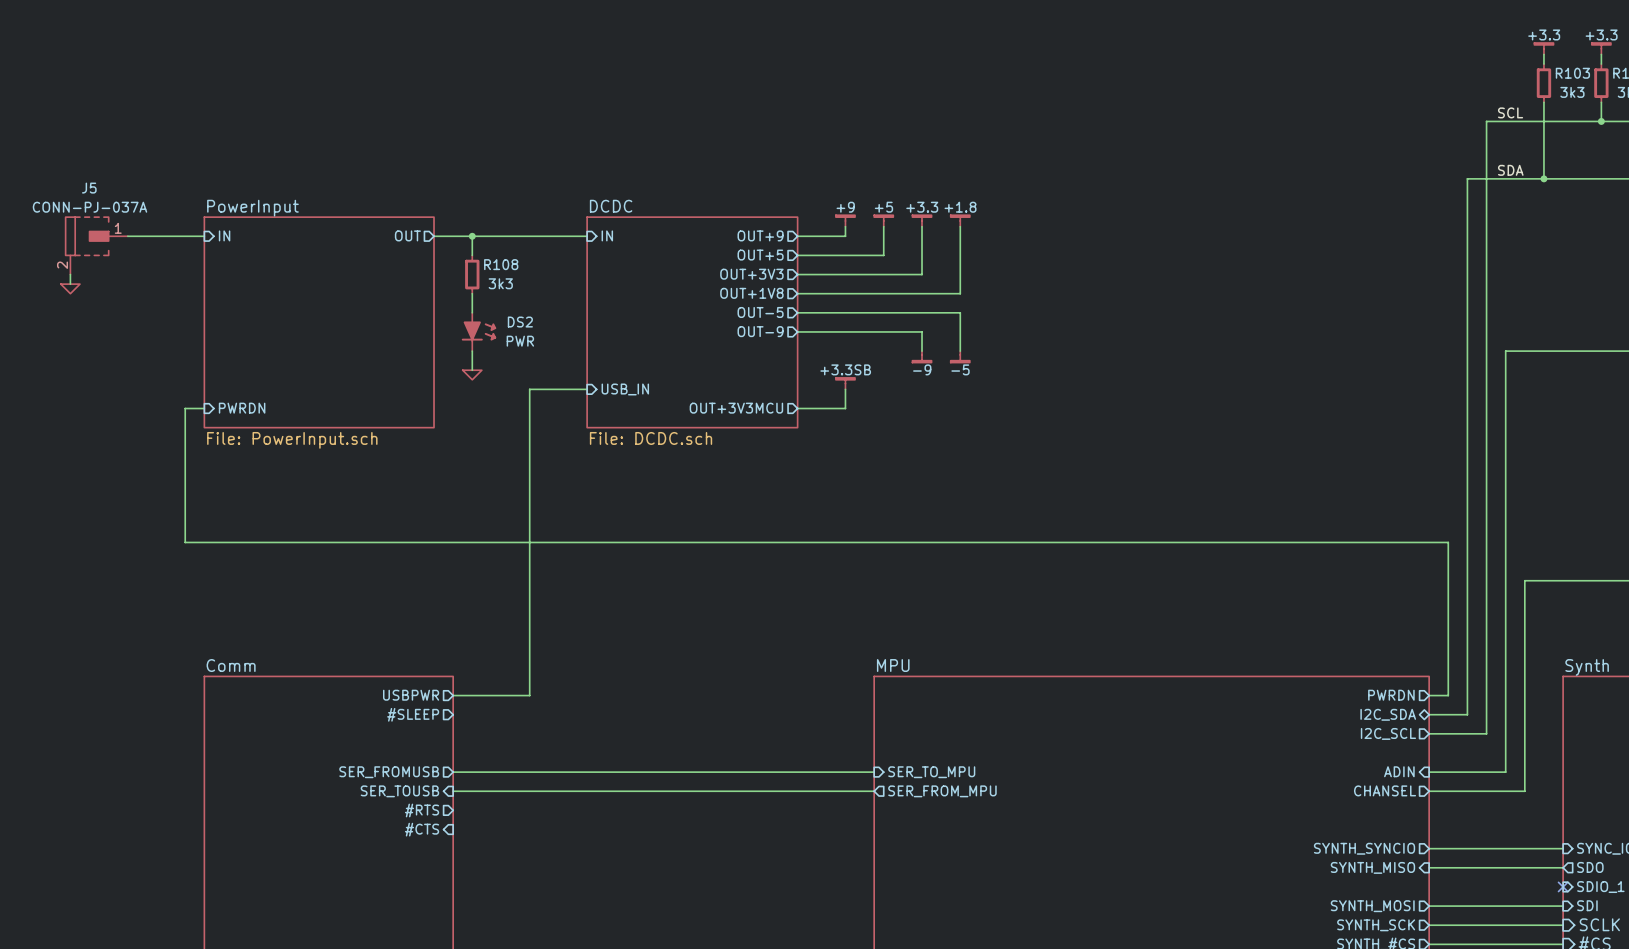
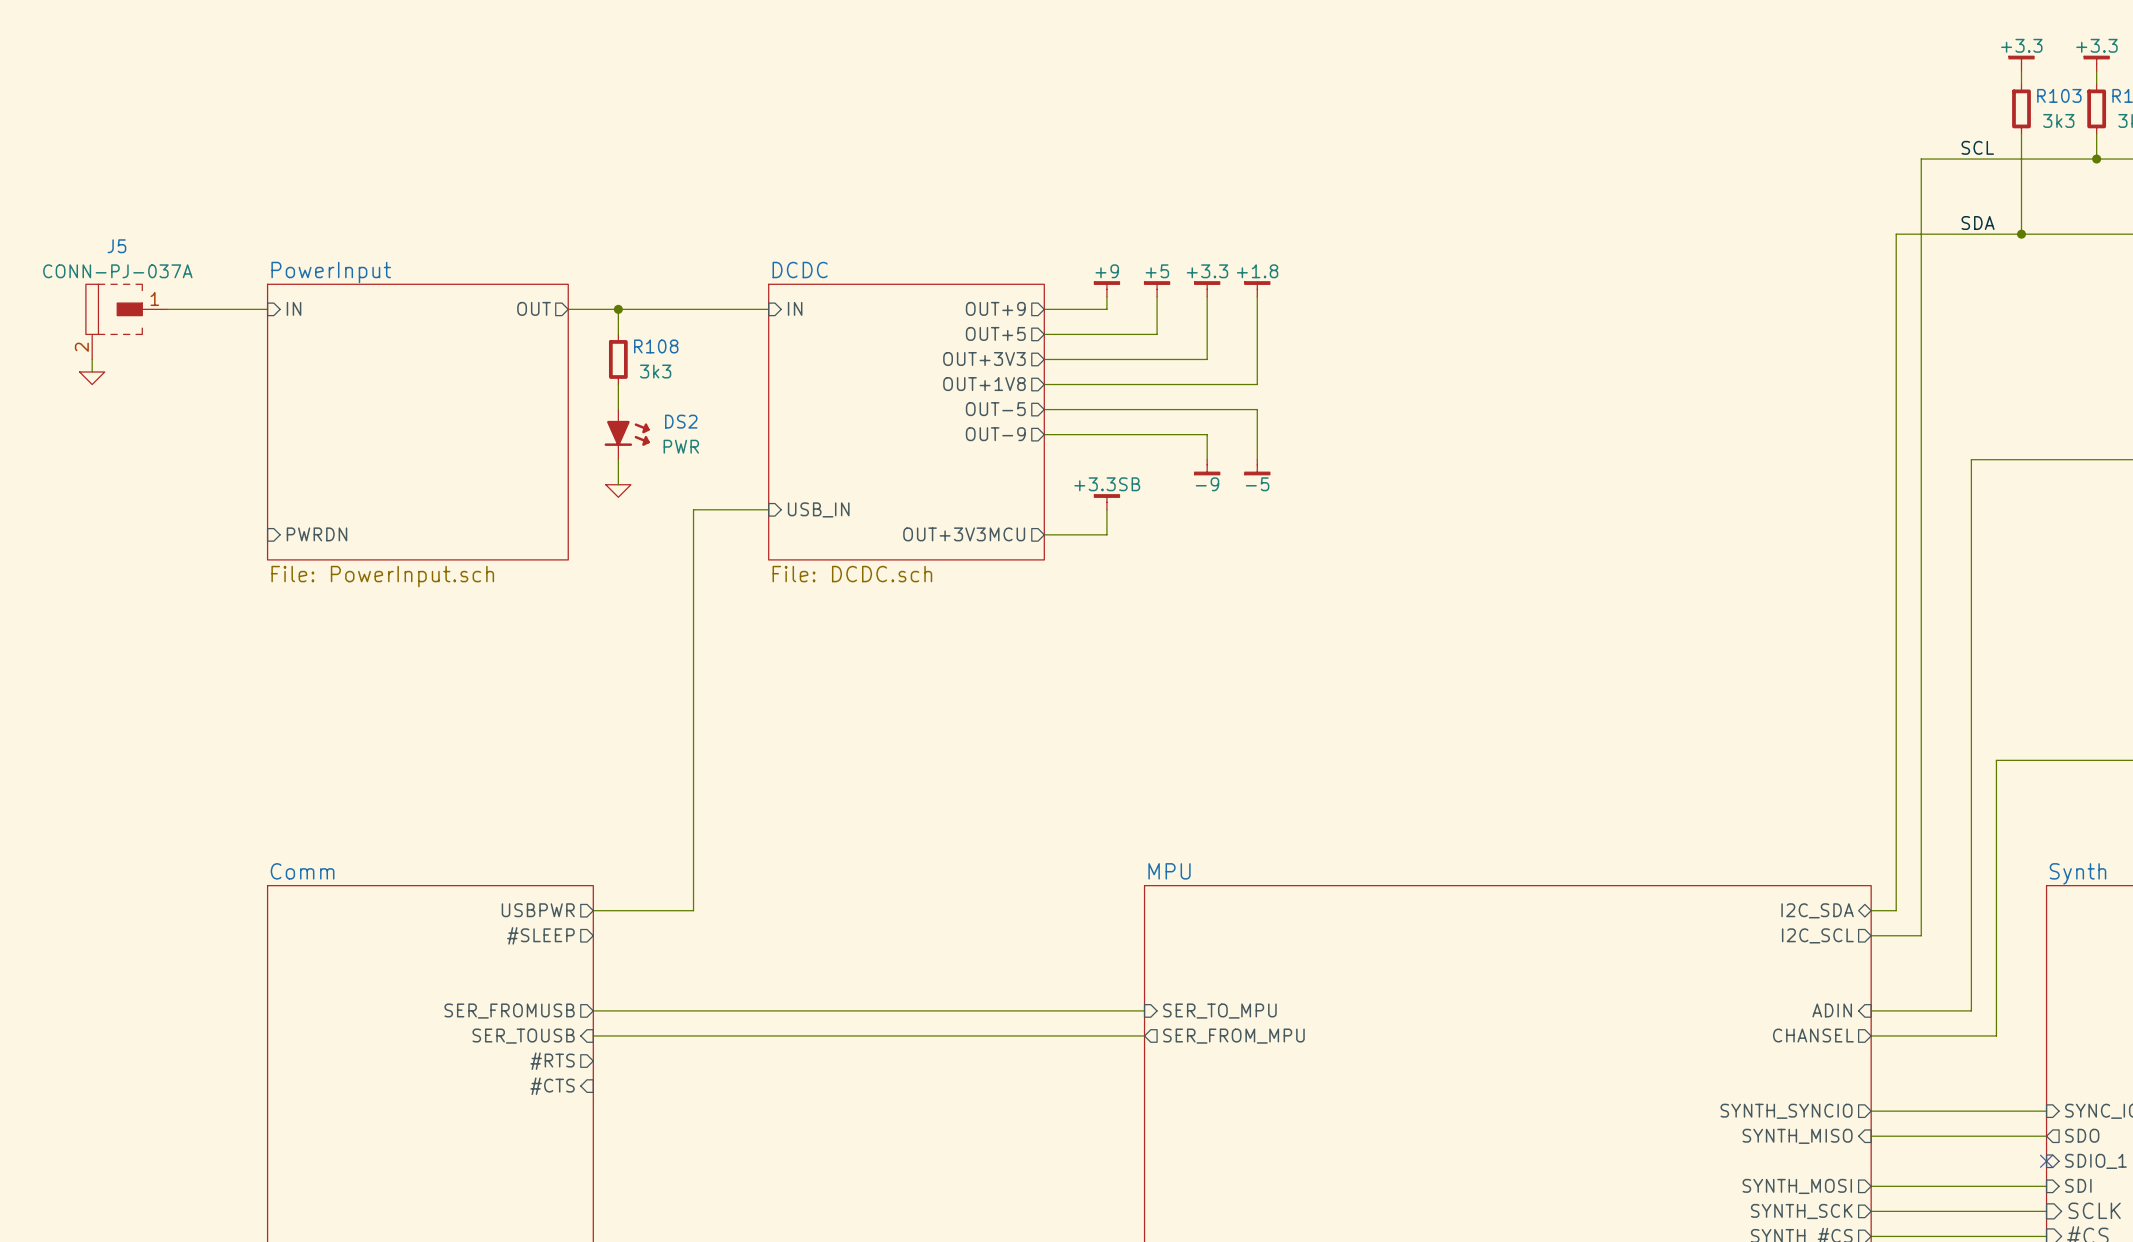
wire: (1486, 121) (1486, 733) (1429, 733) -> (1946, 159) (1921, 159) (1921, 234) (1896, 234) (1896, 710)
wire: (204, 408) (185, 408) (185, 542) (1448, 542) -> none
sheet pin shape: output (1391, 695) -> bidirectional (1817, 910)
sheet pin: PWRDN (1391, 695) -> I2C_SDA (1817, 910)
sheet pin shape: bidirectional (1388, 714) -> output (1817, 935)
sheet pin: I2C_SDA (1388, 714) -> I2C_SCL (1817, 935)
sheet pin: I2C_SCL (1388, 733) -> none

